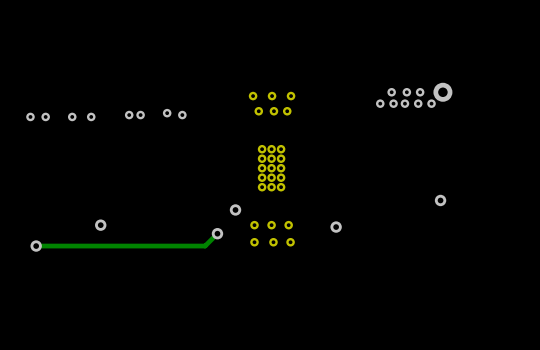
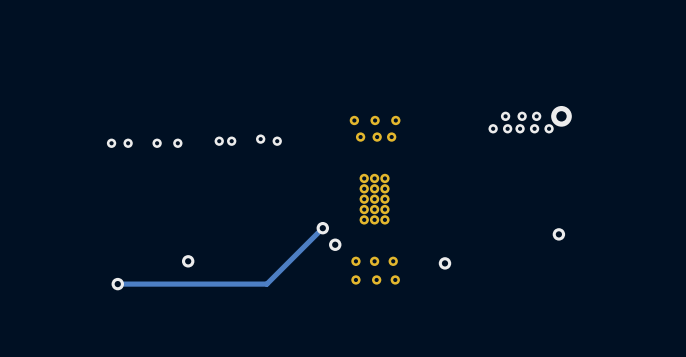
track: (217, 233) (205, 246) (172, 246) -> (322, 228) (266, 284)
via position: (217, 233) -> (322, 228)

